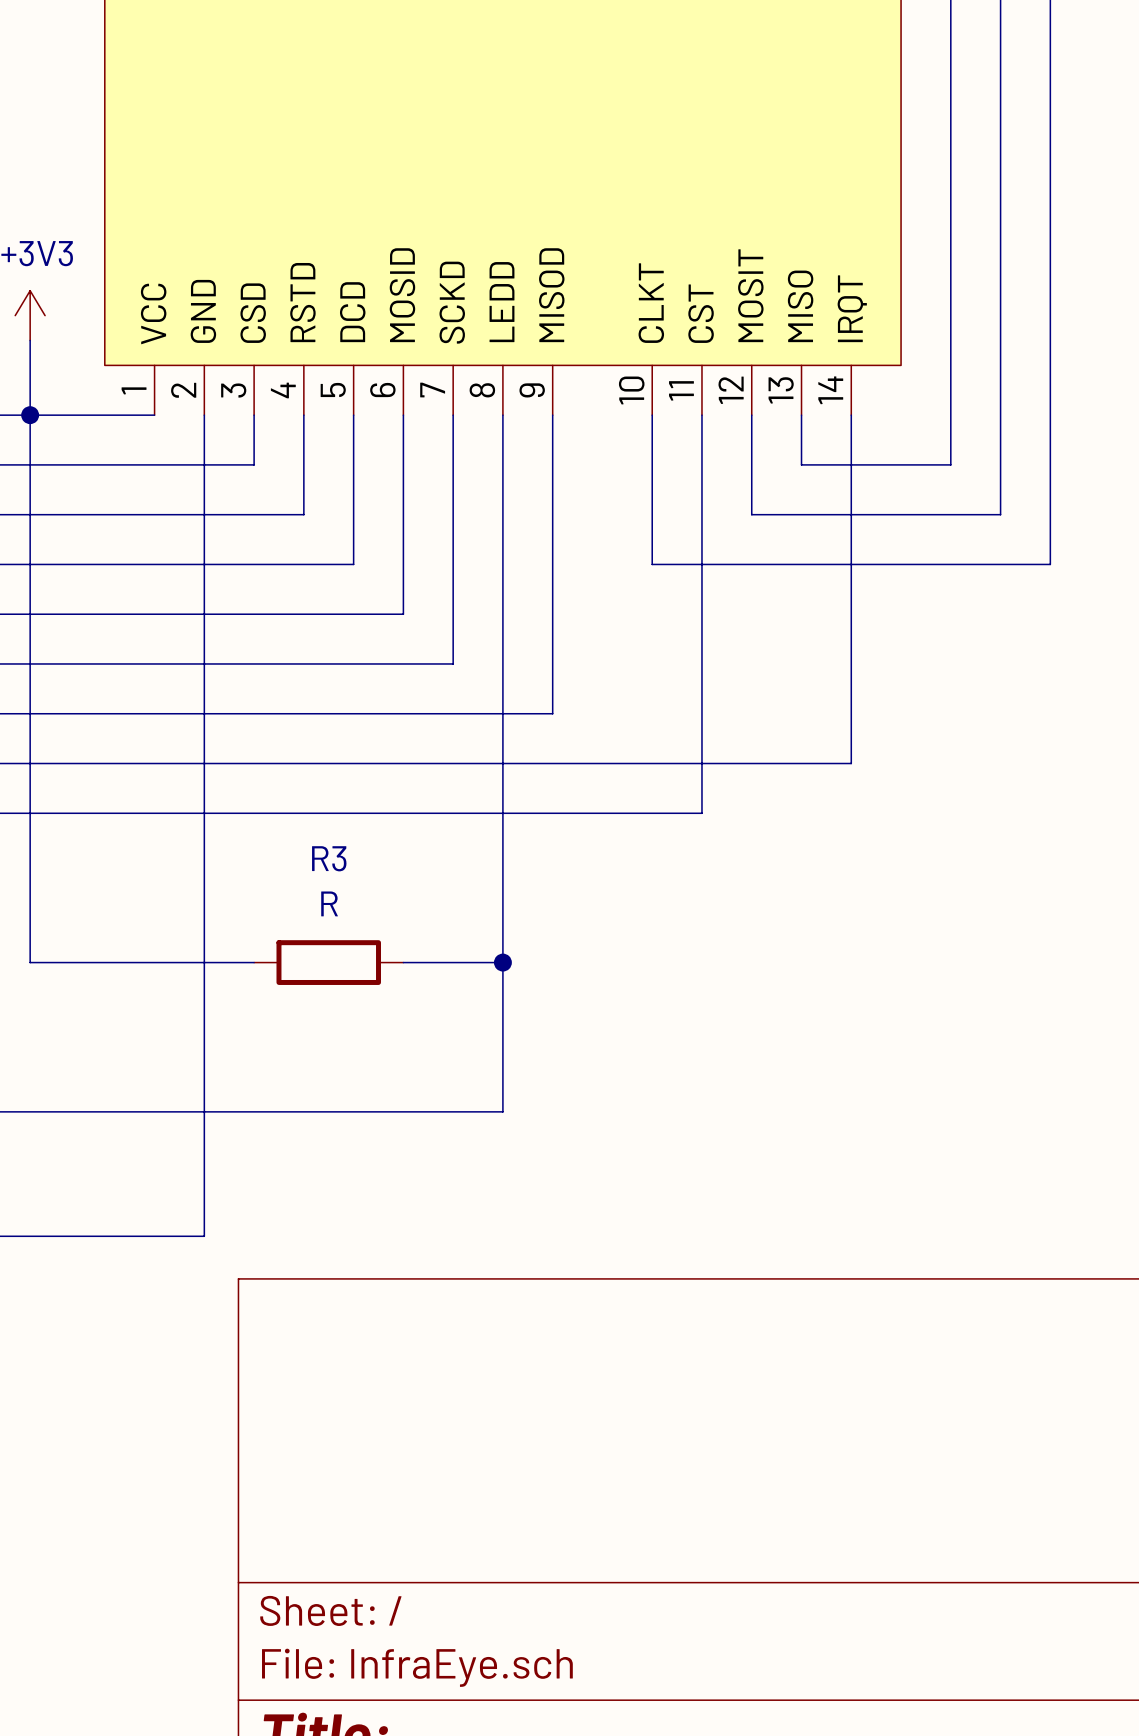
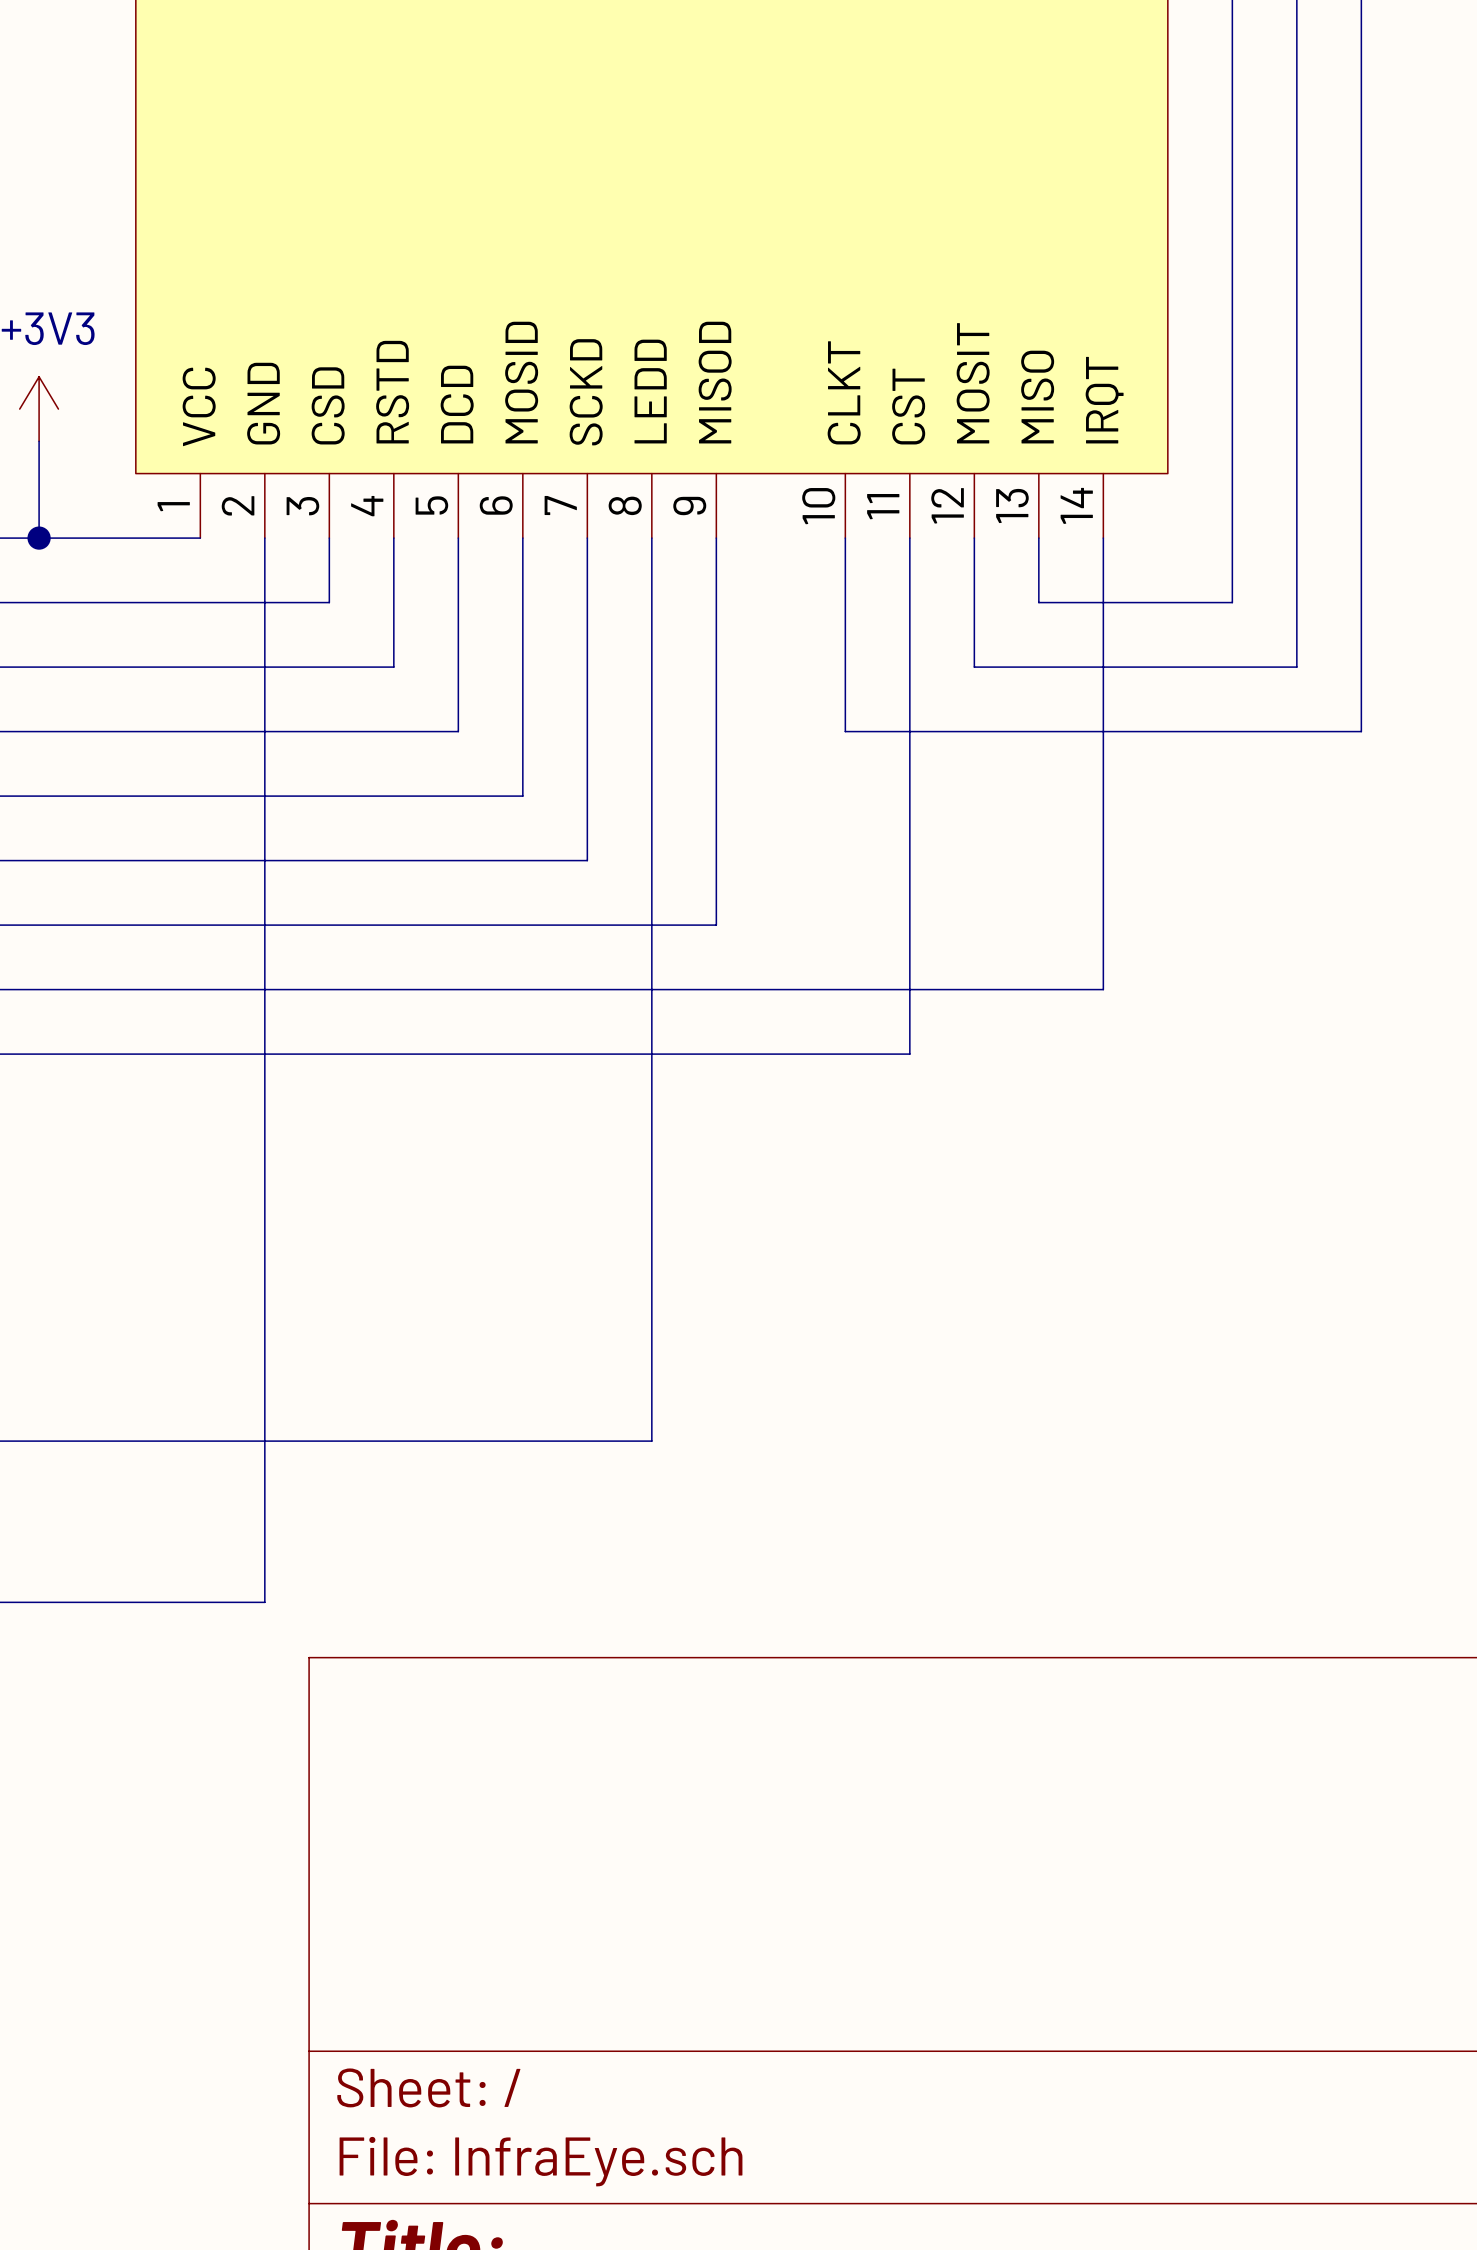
wire: (30, 415) (30, 962) (254, 962) -> none
R3: R (328, 962) -> none
wire: (403, 962) (502, 962) -> none
junction: (502, 962) -> none

